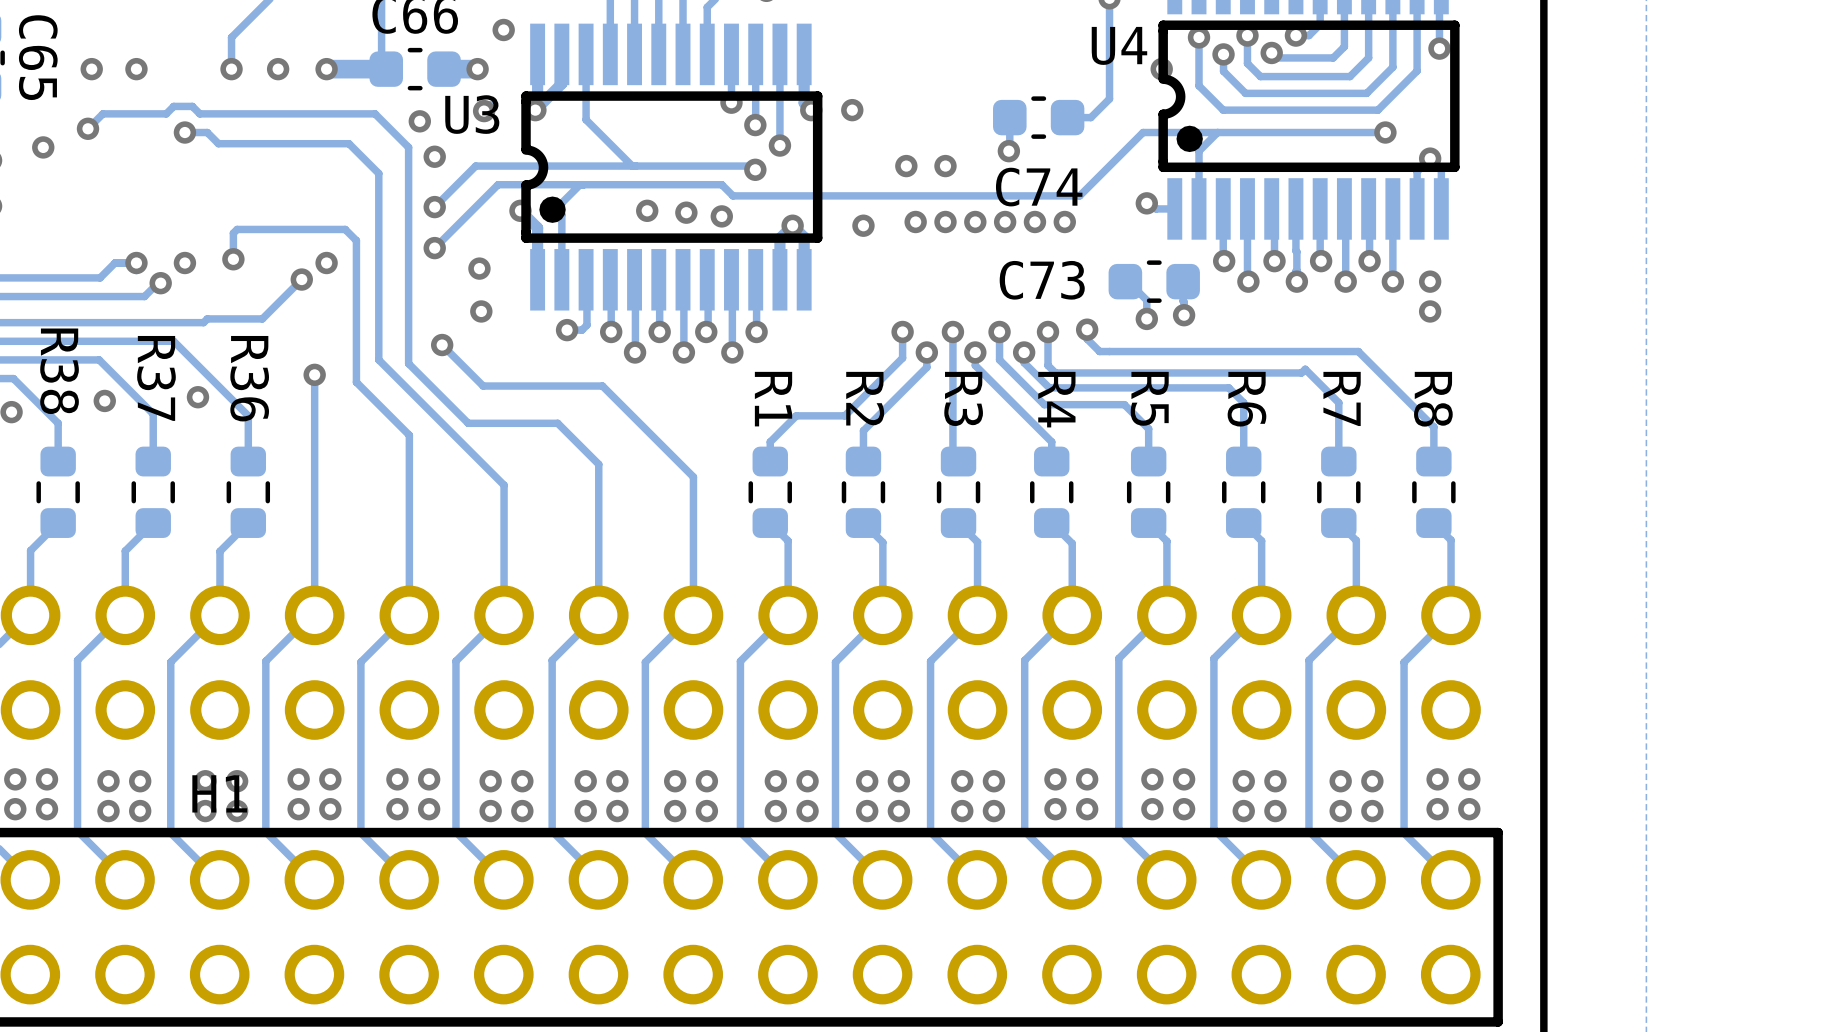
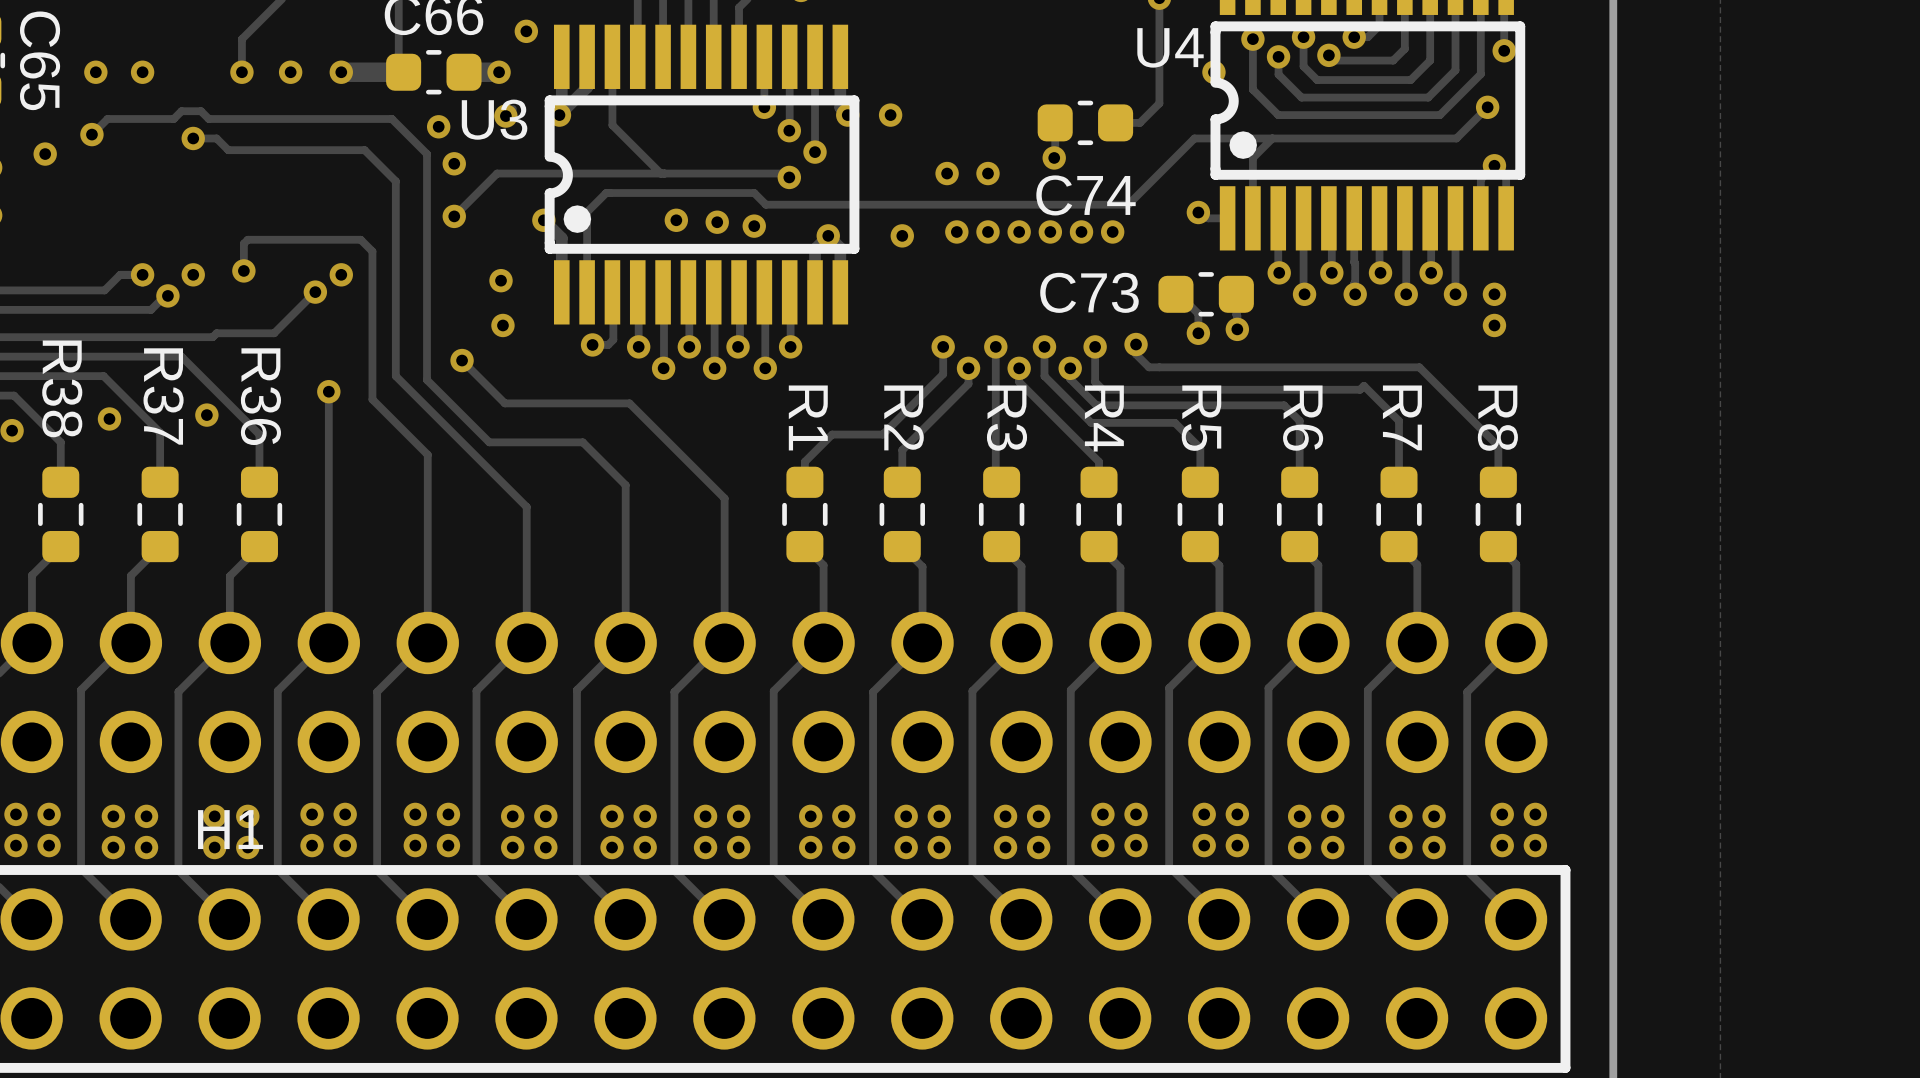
track: none -> (1487, 107) (1456, 138) (1447, 138)
via position: (1385, 132) -> (1487, 107)
track: (580, 184) (498, 184) (434, 248) -> none
via: (434, 248) -> none

